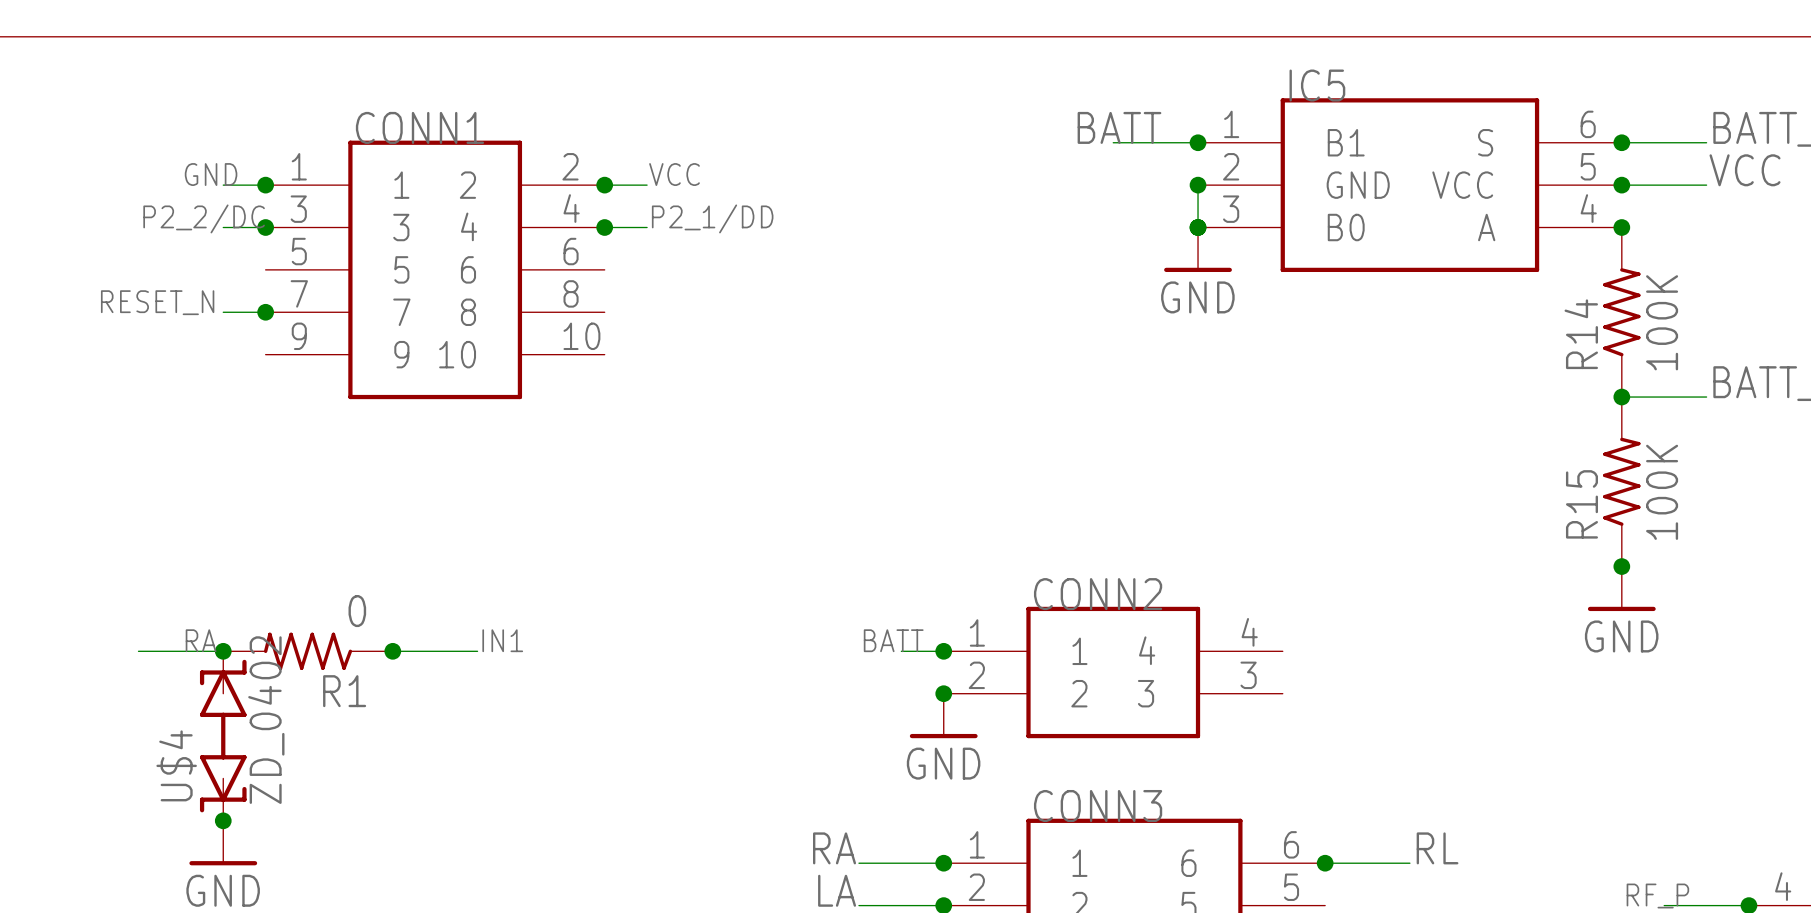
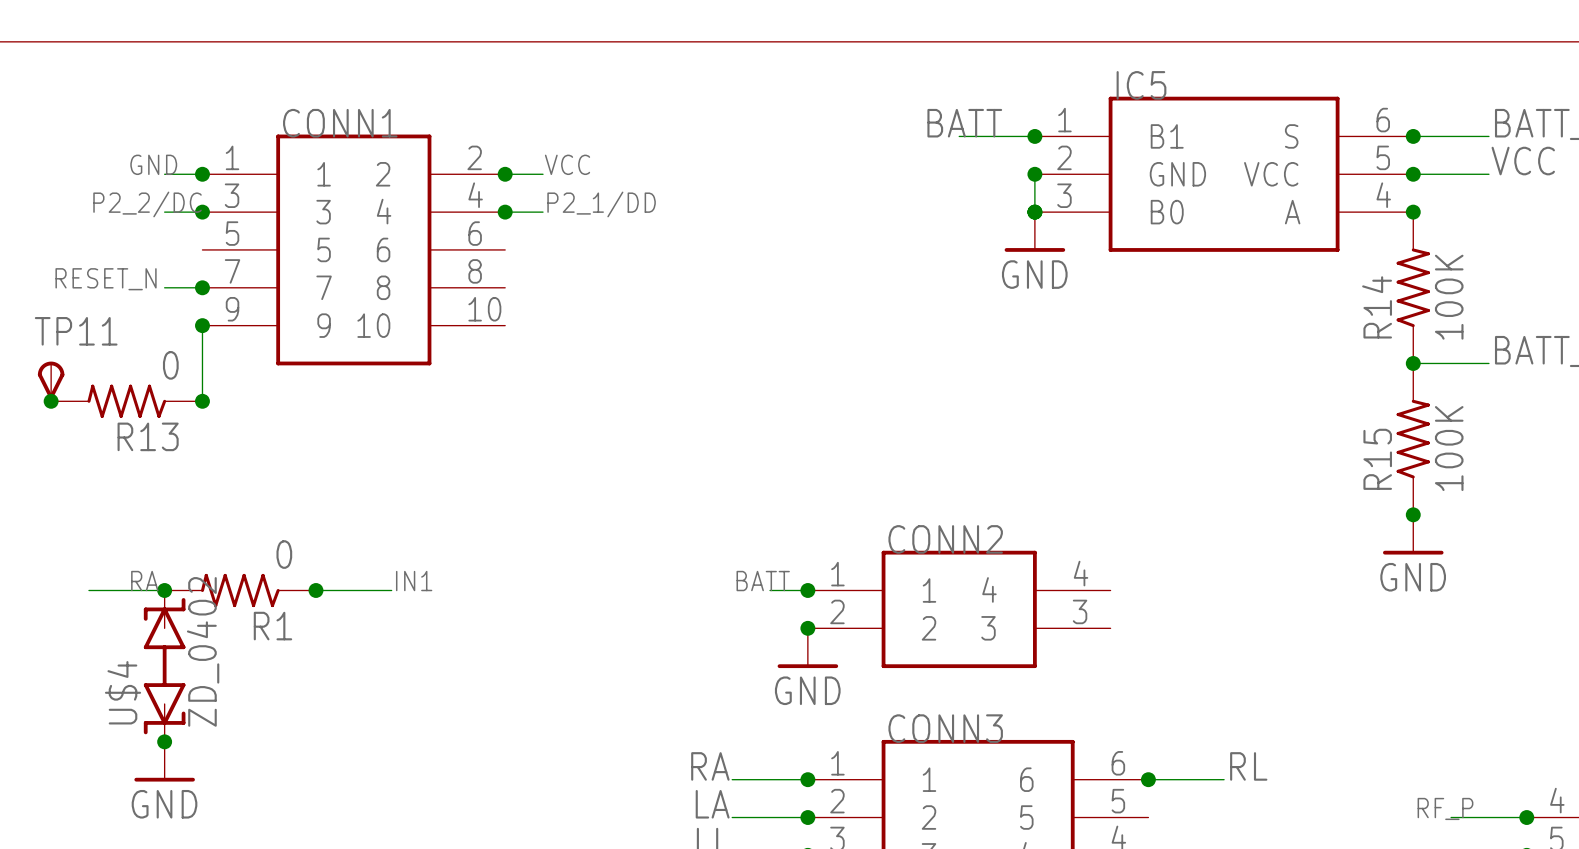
wire: none -> (202, 325) (202, 401)
junction: none -> (202, 325)
TP11: none -> (51, 381)
junction: none -> (51, 401)
R13: none -> 0 (126, 401)
junction: none -> (202, 401)

